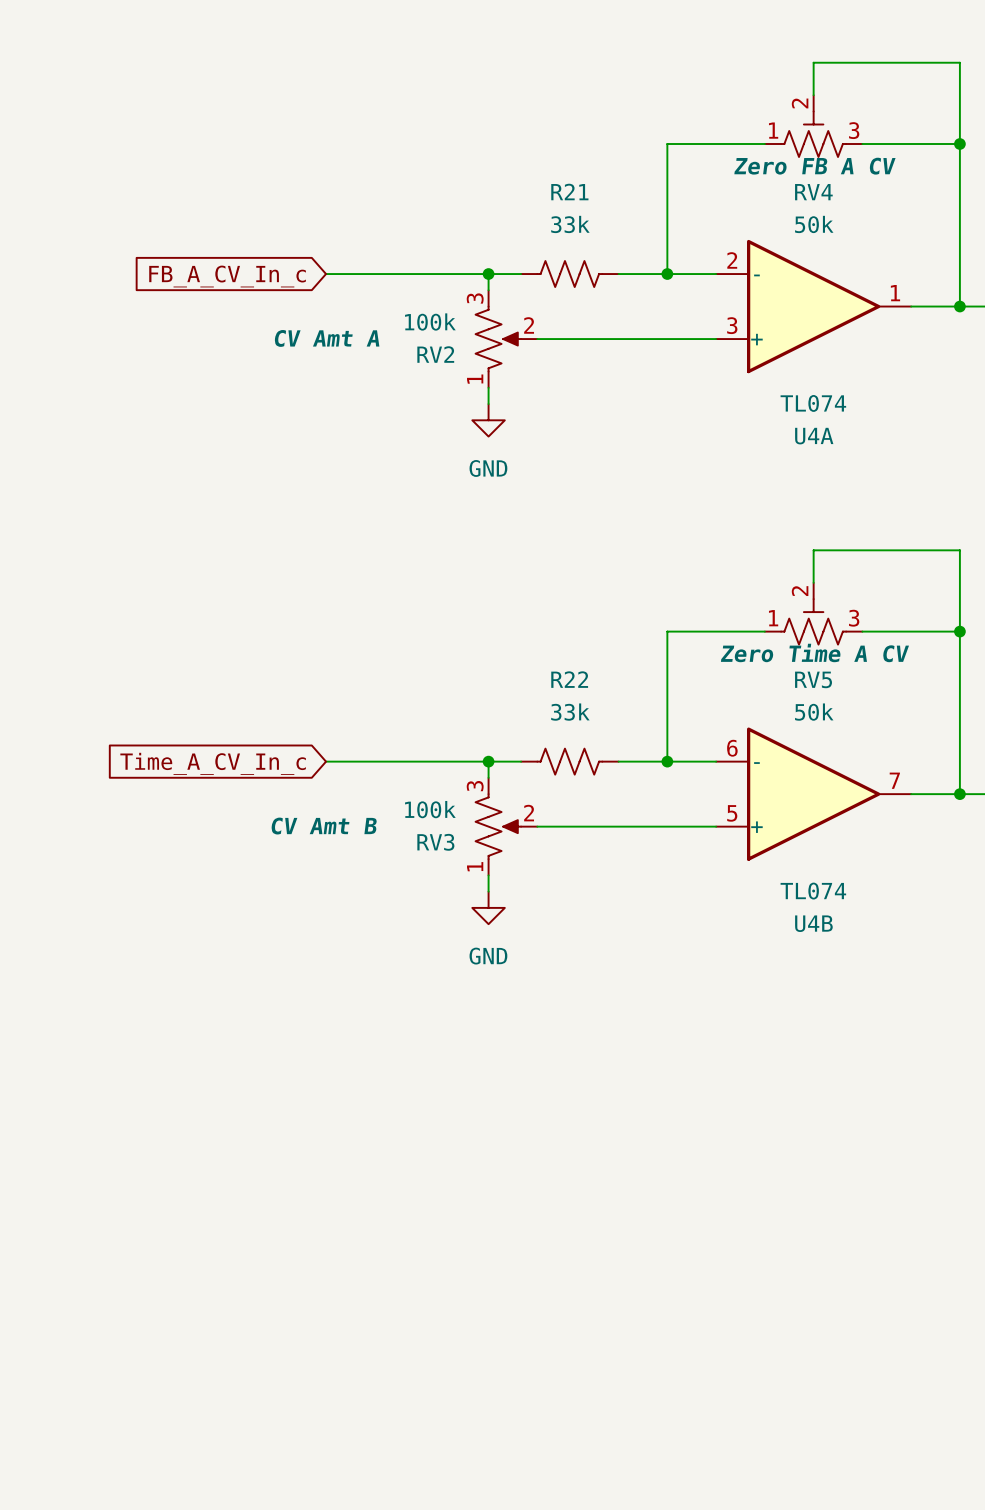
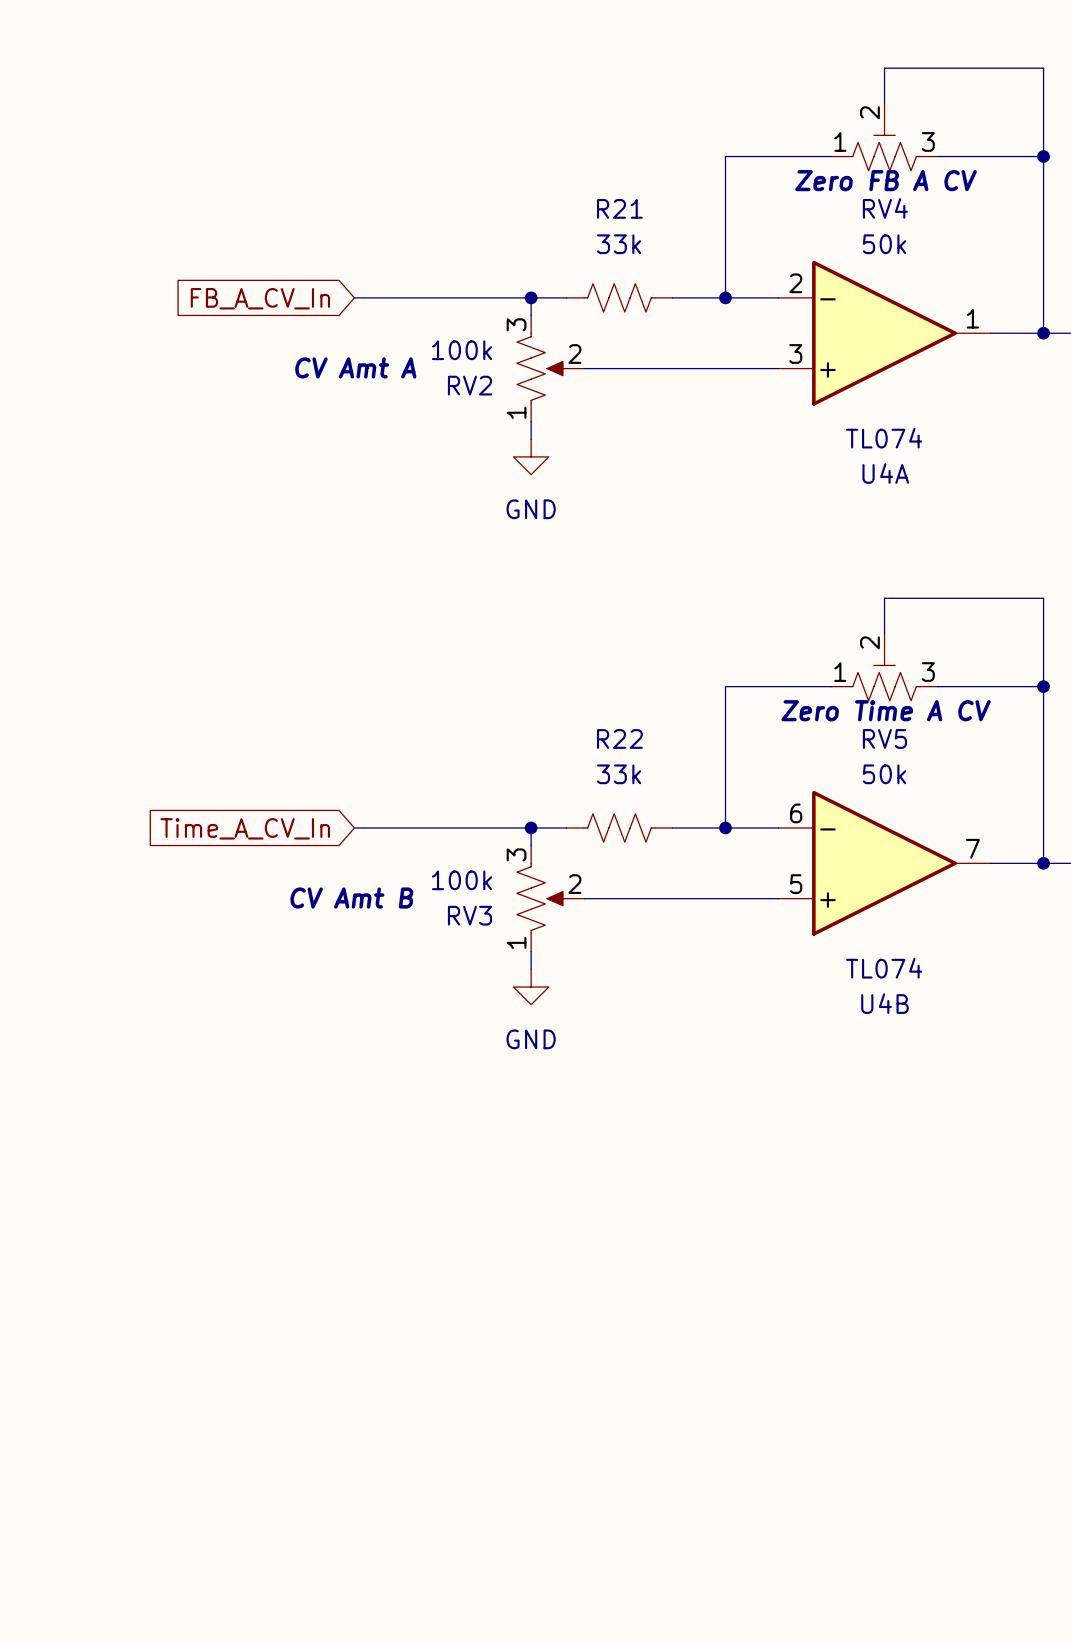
global label: FB_A_CV_In_c (227, 276) -> FB_A_CV_In (260, 298)
global label: Time_A_CV_In_c (213, 763) -> Time_A_CV_In (245, 828)

